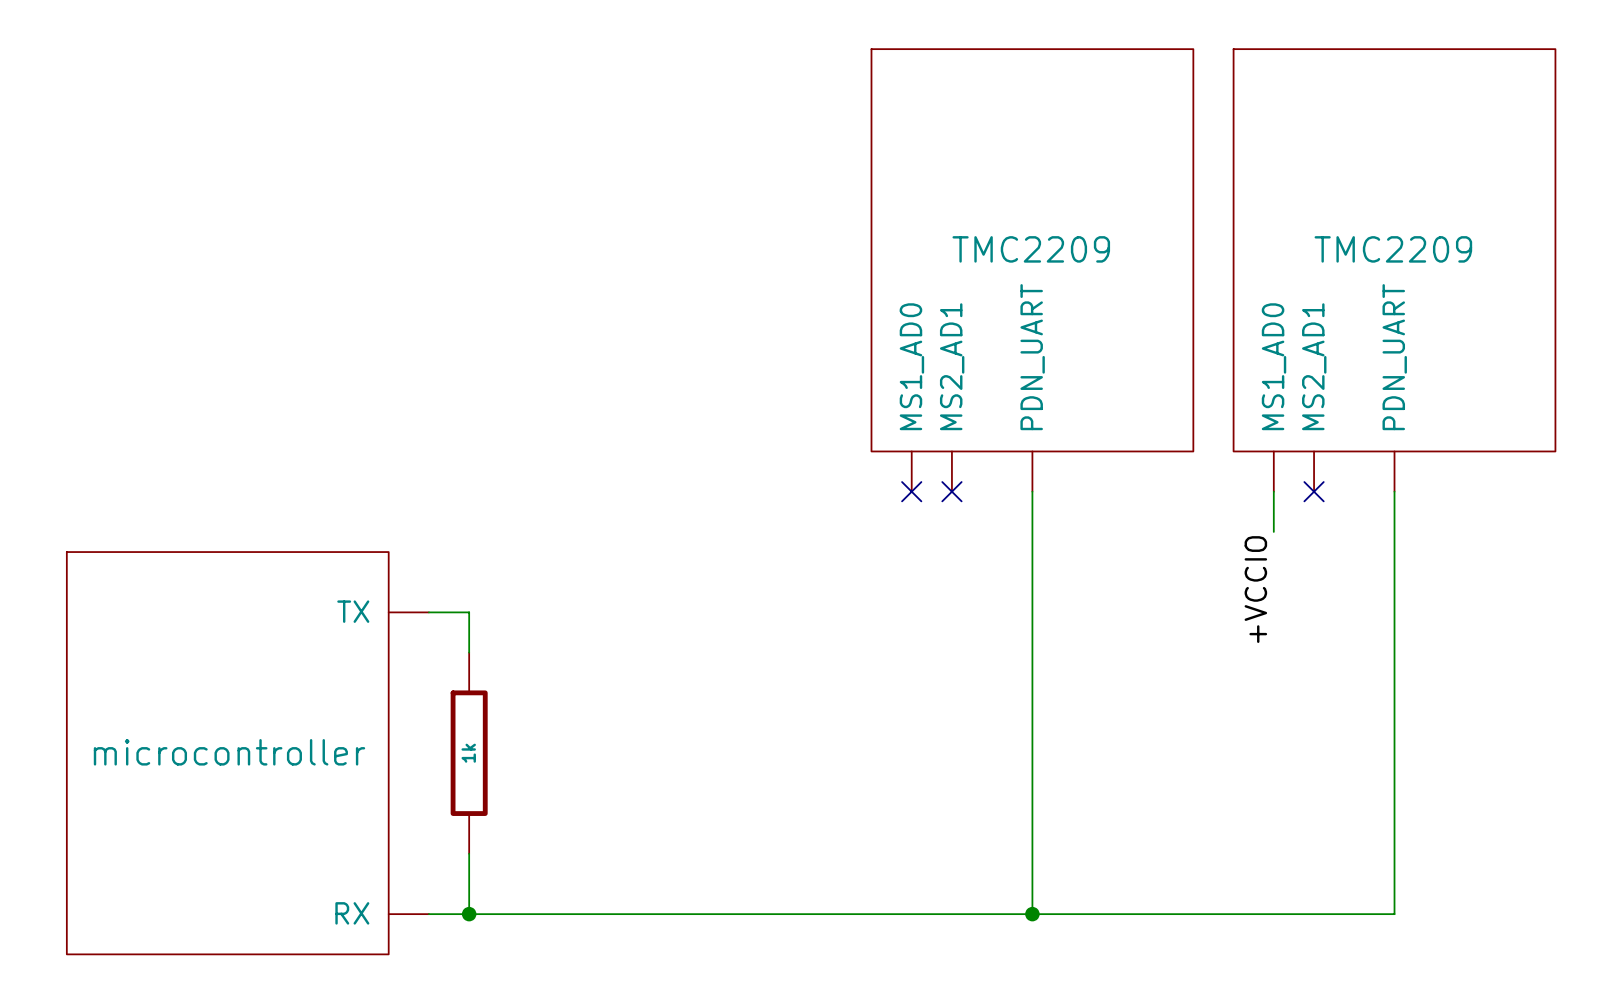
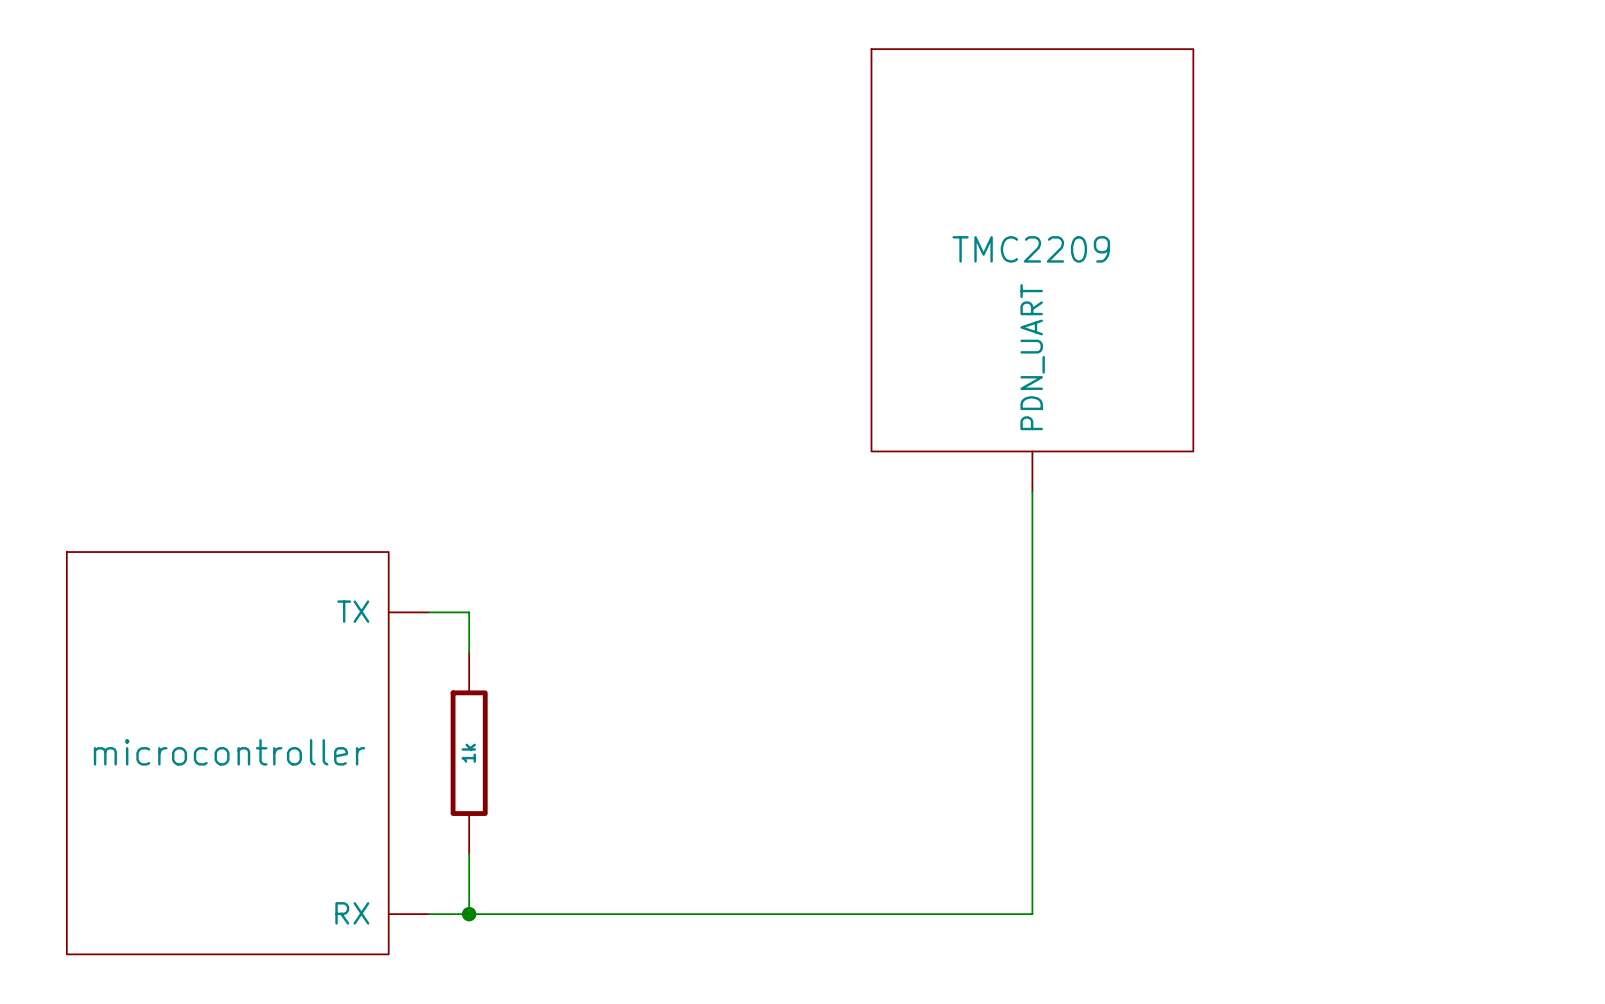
part symbol: [871, 49, 1194, 492] -> [871, 49, 1194, 492]
part: TMC2209 (1394, 270) -> none
no-connect mark: (911, 491) -> none
no-connect mark: (951, 491) -> none
wire: (1273, 491) (1273, 531) -> none
no-connect mark: (1314, 491) -> none
wire: (1394, 491) (1394, 914) (1032, 914) -> none
label: +VCCIO (1255, 589) -> none
junction: (1032, 914) -> none

